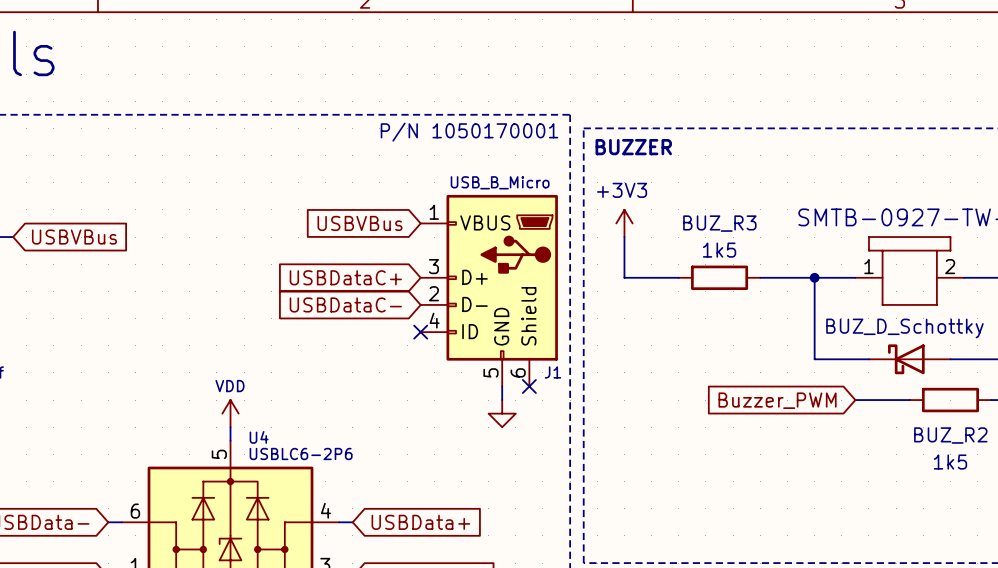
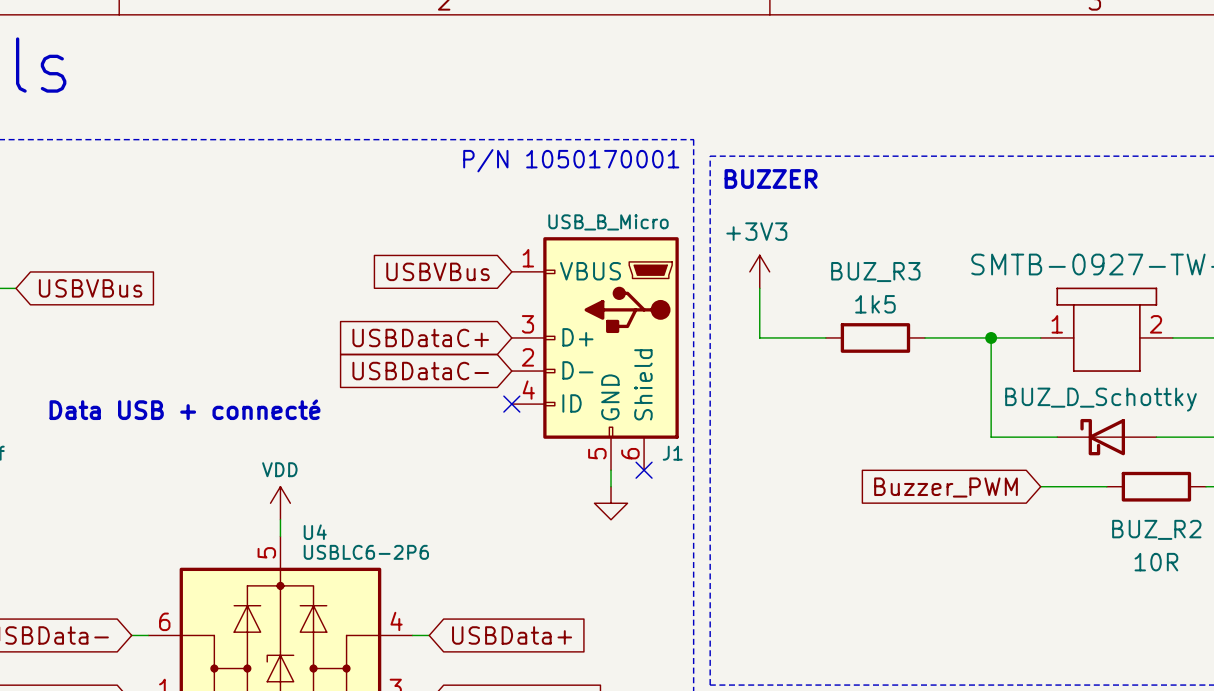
text: none -> Data USB + connecté (184, 409)
BUZ_R2 value: 1k5 (950, 462) -> 10R (1156, 562)

